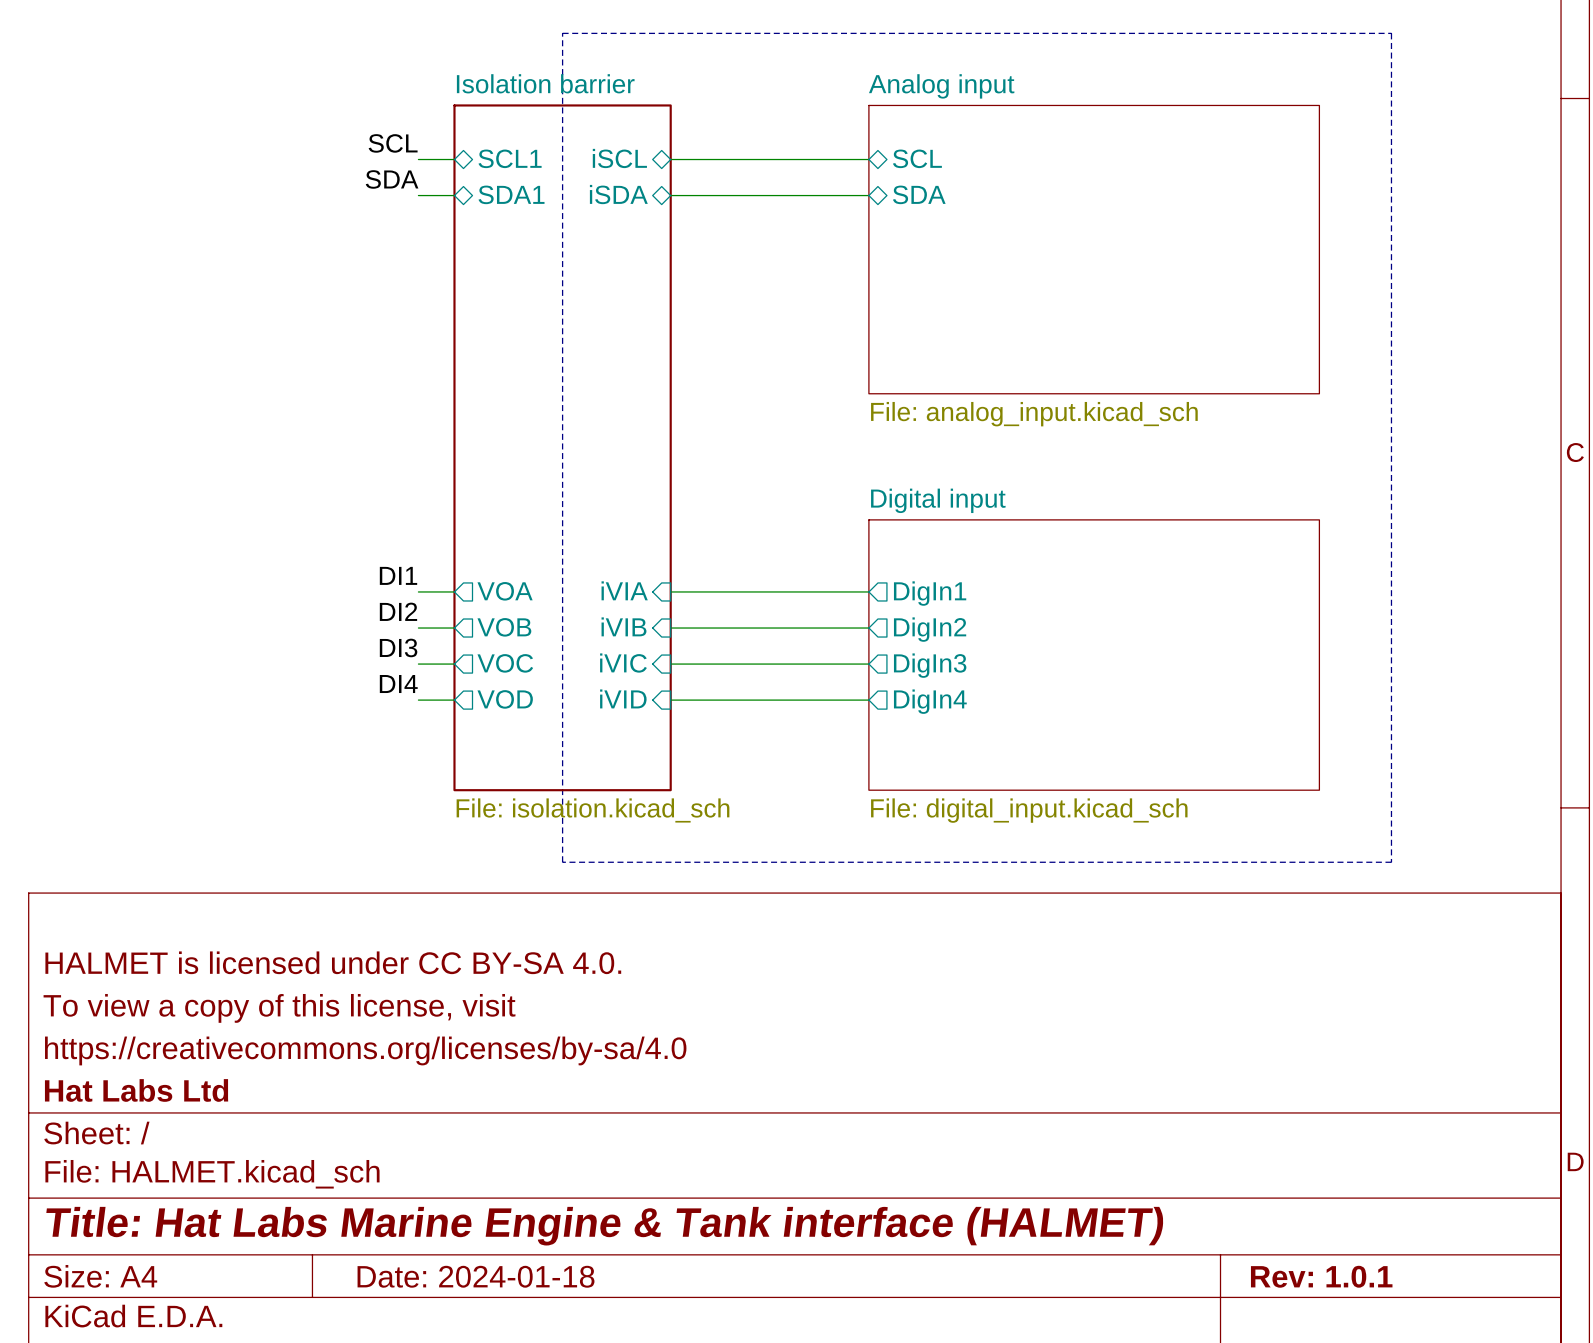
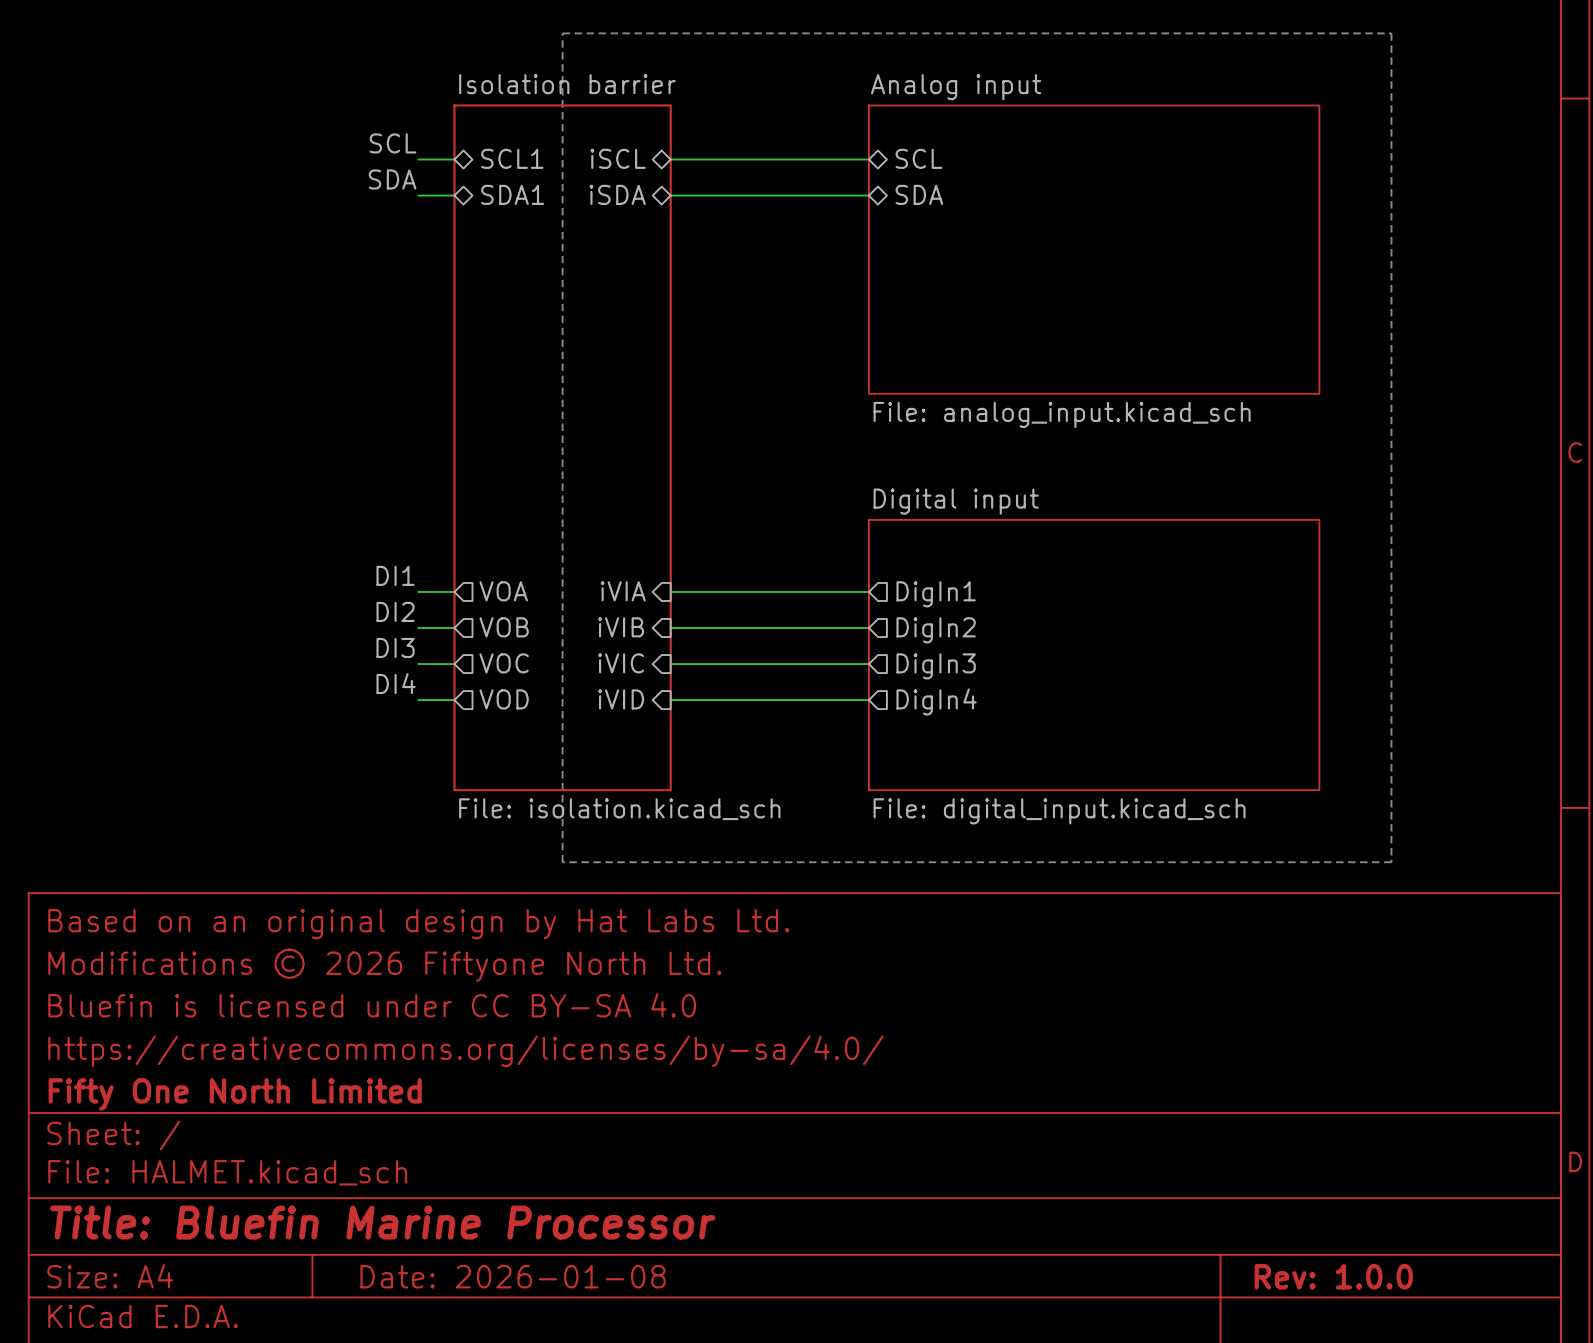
title block: none -> Based on an original design by Hat Labs Ltd. (418, 924)
title block: HALMET is licensed under CC BY-SA 4.0. (333, 962) -> Modifications © 2026 Fiftyone North Ltd. (384, 965)
title block: To view a copy of this license, visit (279, 1008) -> Bluefin is licensed under CC BY-SA 4.0 (372, 1005)
title block: https://creativecommons.org/licenses/by-sa/4.0 (365, 1050) -> https://creativecommons.org/licenses/by-sa/4.0/ (465, 1051)
title block: Hat Labs Ltd (136, 1090) -> Fifty One North Limited (235, 1094)
title block: Title: Hat Labs Marine Engine & Tank interface (HALMET) (604, 1226) -> Title: Bluefin Marine Processor (382, 1222)
title block: Date: 2024-01-18 (476, 1276) -> Date: 2026-01-08 (513, 1276)
title block: Rev: 1.0.1 (1321, 1276) -> Rev: 1.0.0 (1333, 1276)

